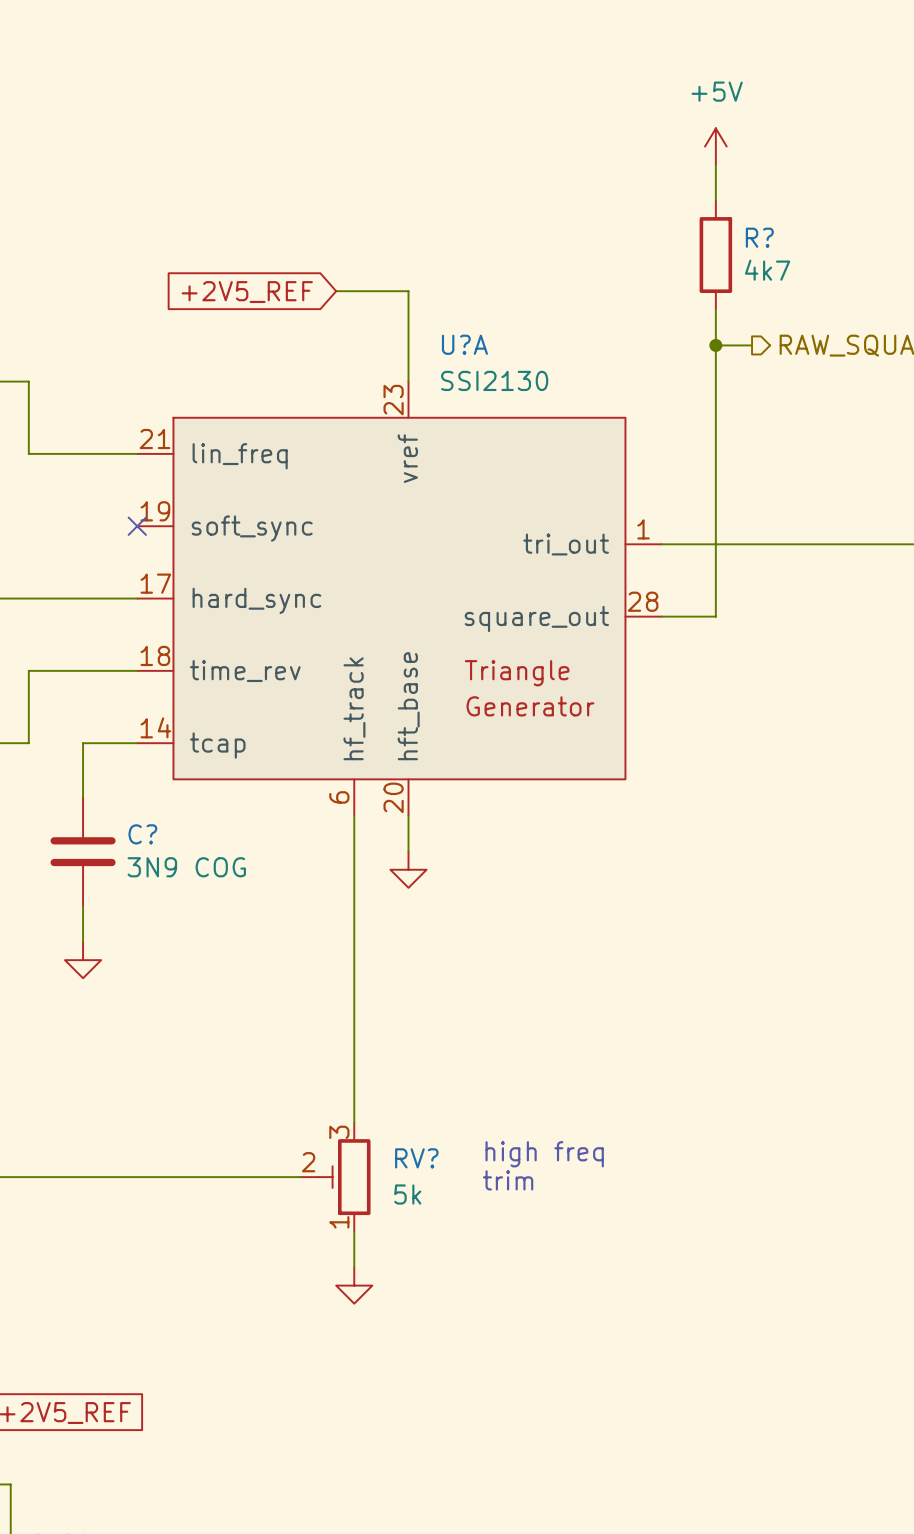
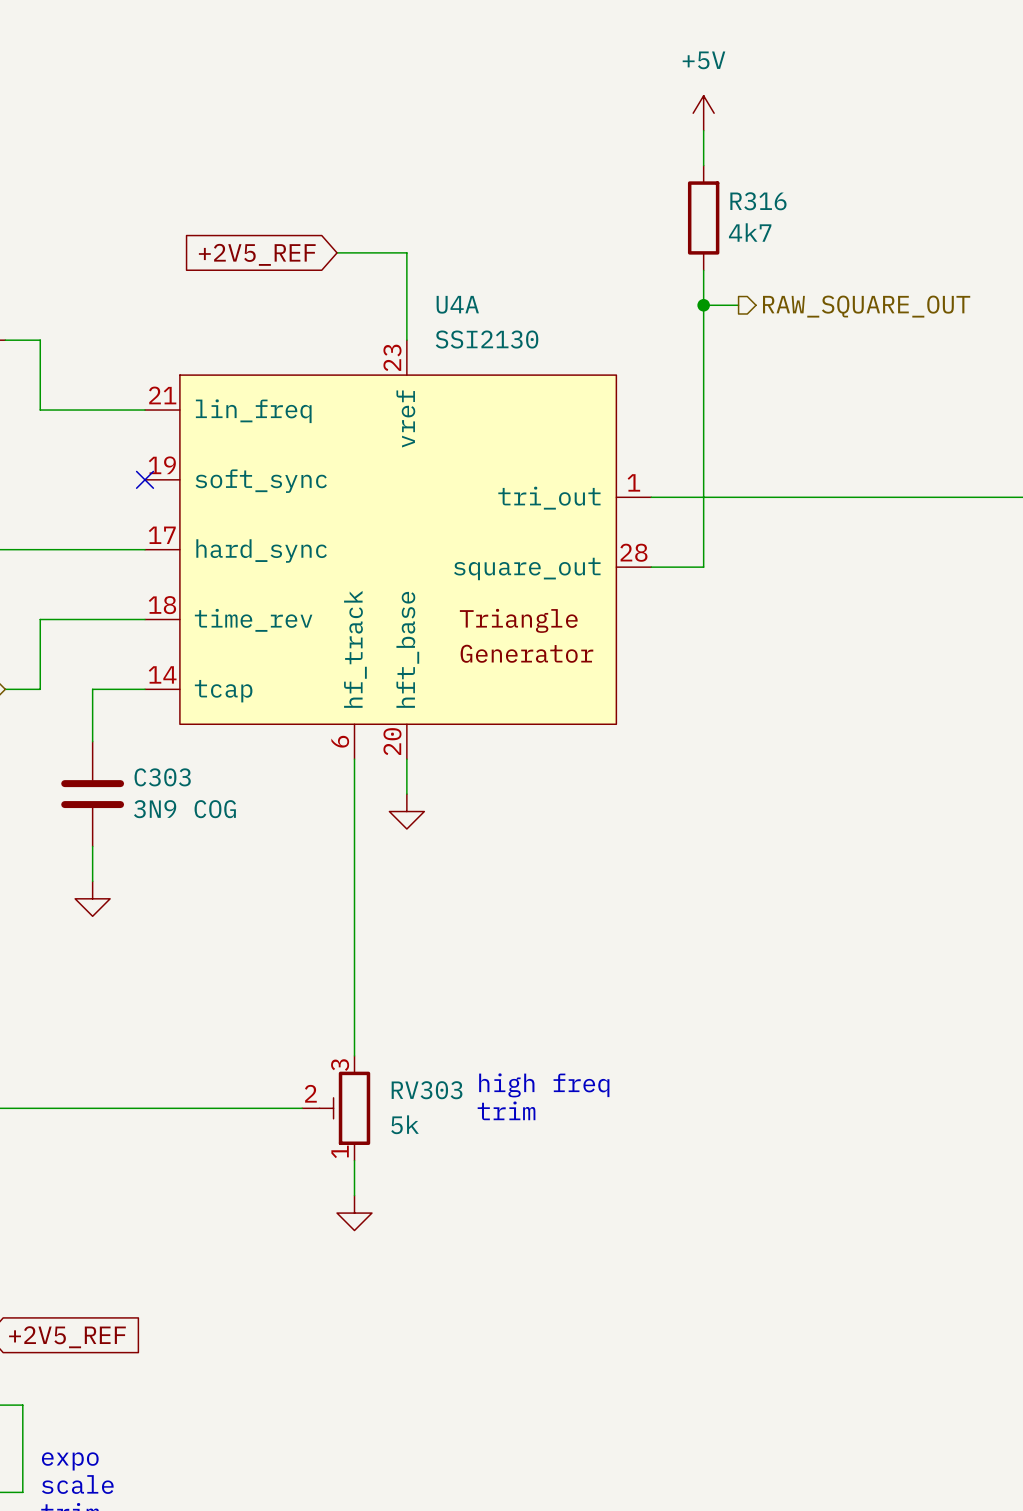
R? name: R? (759, 237) -> R316 (758, 201)
U?A name: U?A (464, 344) -> U4A (457, 304)
C? name: C? (142, 834) -> C303 (162, 777)
RV? name: RV? (416, 1158) -> RV303 (427, 1090)

